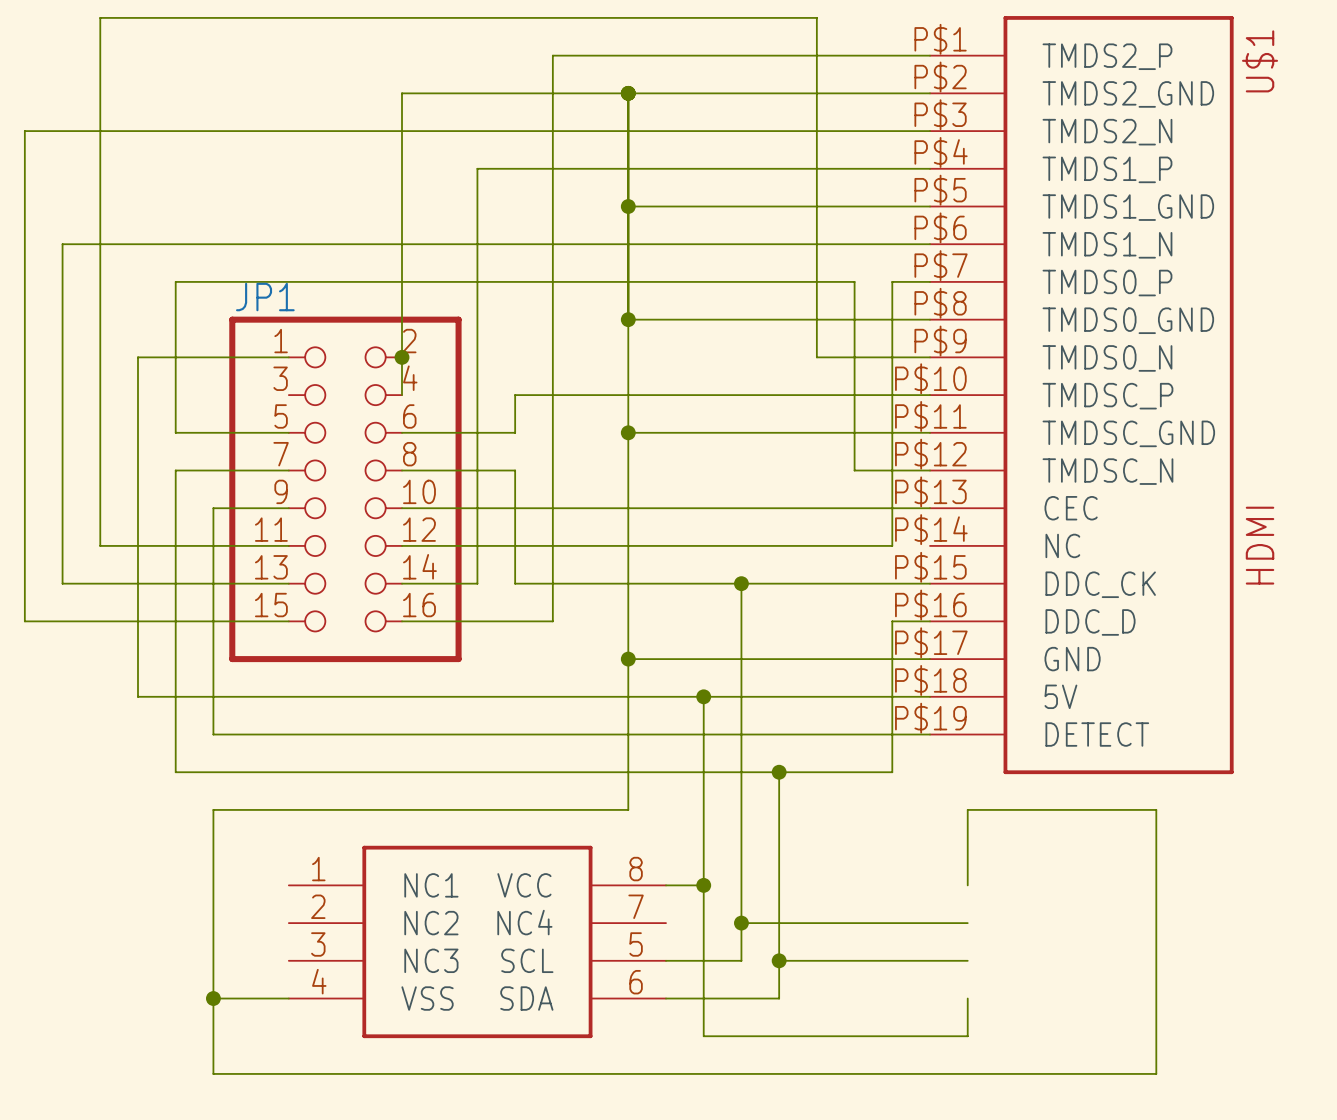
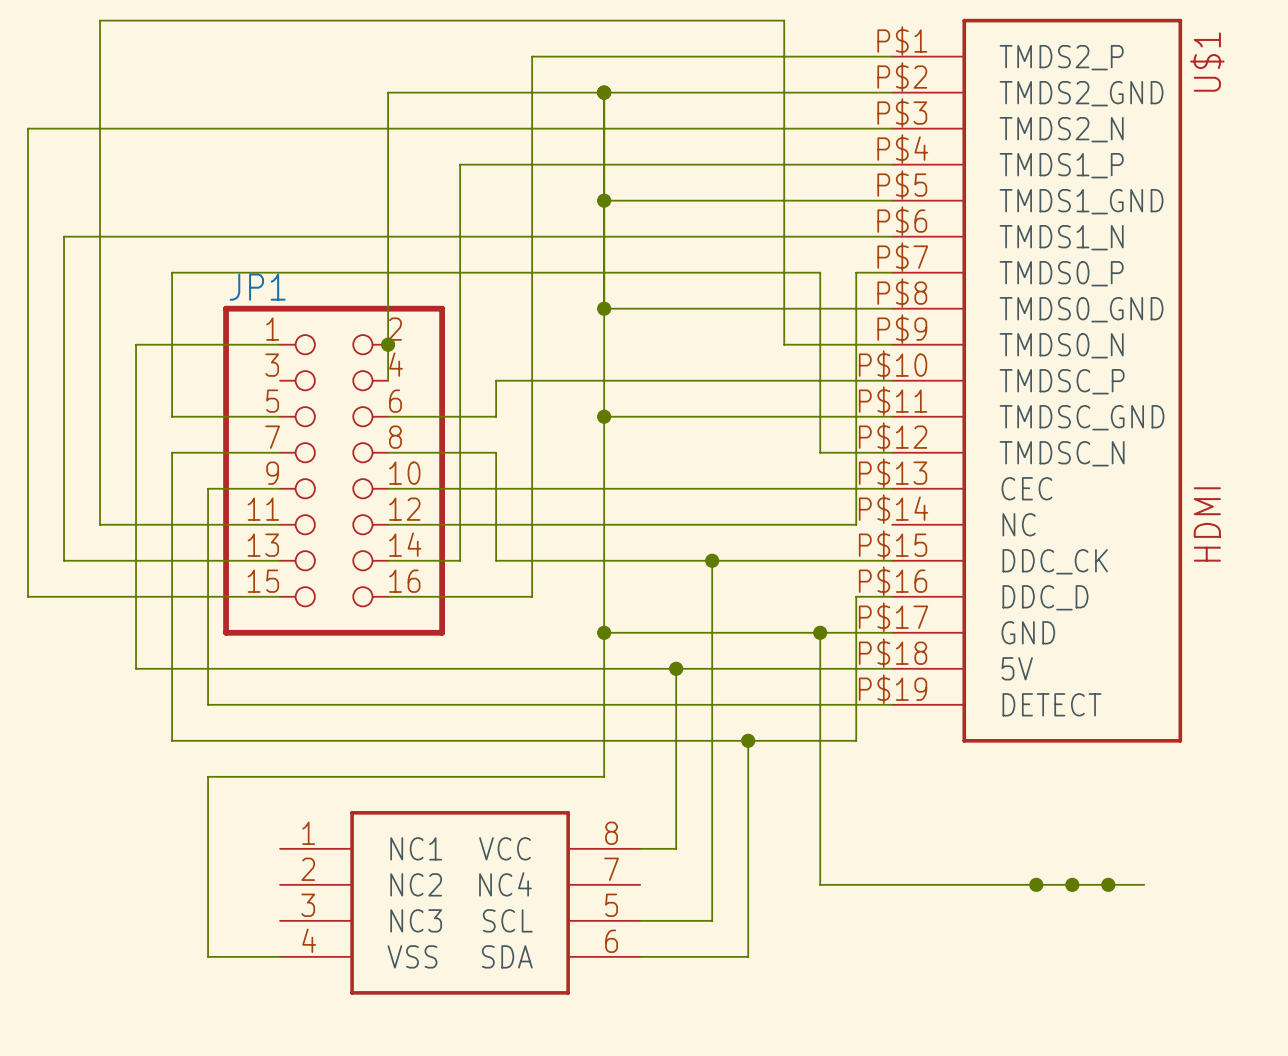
junction: none -> (820, 632)
wire: (703, 885) (703, 1036) (967, 1036) (967, 998) -> none
junction: (703, 885) -> none
wire: (967, 885) (967, 809) (1156, 809) (1156, 1073) (213, 1073) (213, 998) -> none
wire: (741, 923) (854, 923) -> (820, 632) (820, 884)
junction: (741, 923) -> none
wire: none -> (928, 884) (1144, 884)
junction: none -> (1036, 884)
junction: none -> (1072, 884)
junction: none -> (1108, 884)
wire: (779, 960) (967, 960) -> none
junction: (779, 960) -> none
junction: (213, 998) -> none

